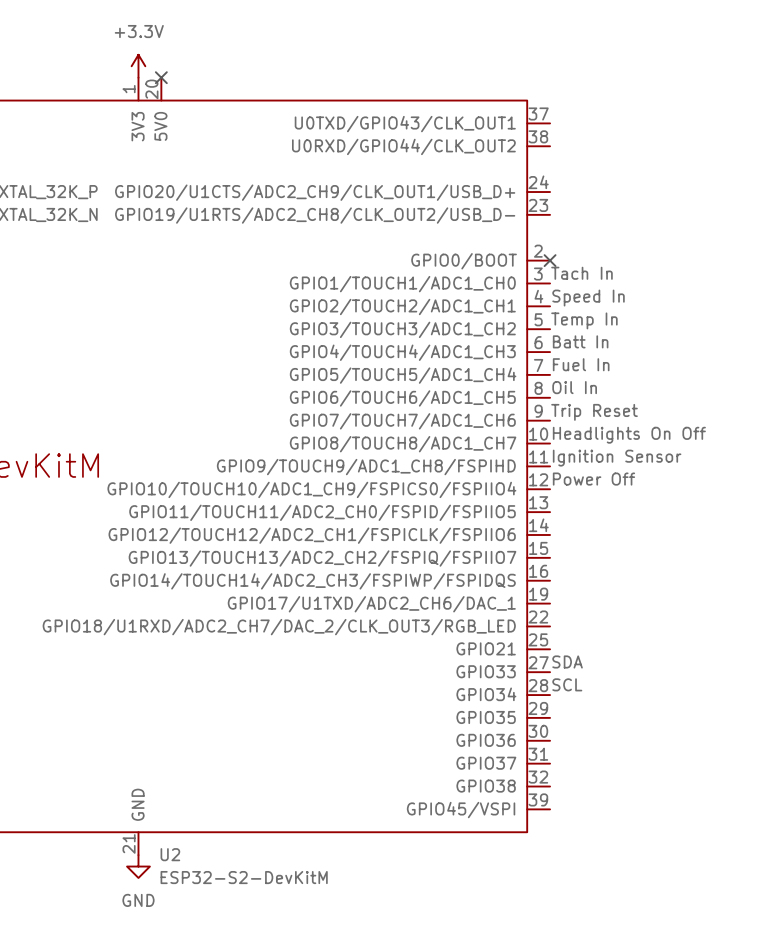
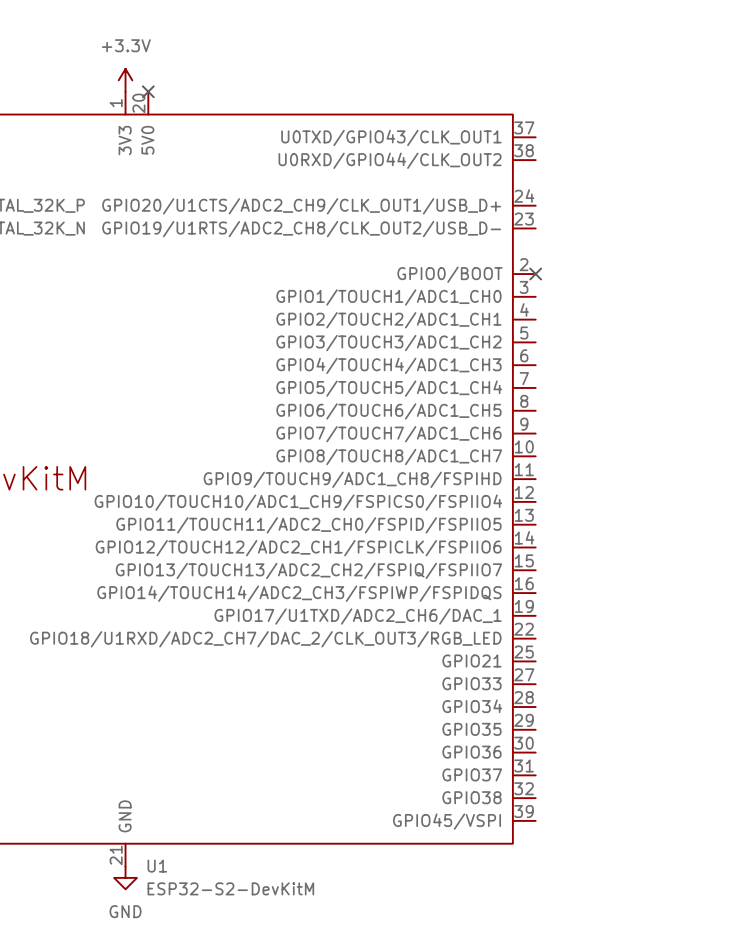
label: Tach In (581, 273) -> none
label: Speed In (588, 298) -> none
label: Temp In (584, 320) -> none
label: Batt In (580, 341) -> none
label: Fuel In (581, 364) -> none
label: Oil In (574, 387) -> none
label: Trip Reset (594, 412) -> none
label: Headlights On Off (629, 435) -> none
label: Ignition Sensor (617, 458) -> none
label: Power Off (593, 479) -> none
label: SDA (567, 661) -> none
label: SCL (567, 684) -> none
U2 name: U2 (170, 854) -> U1 (157, 866)

